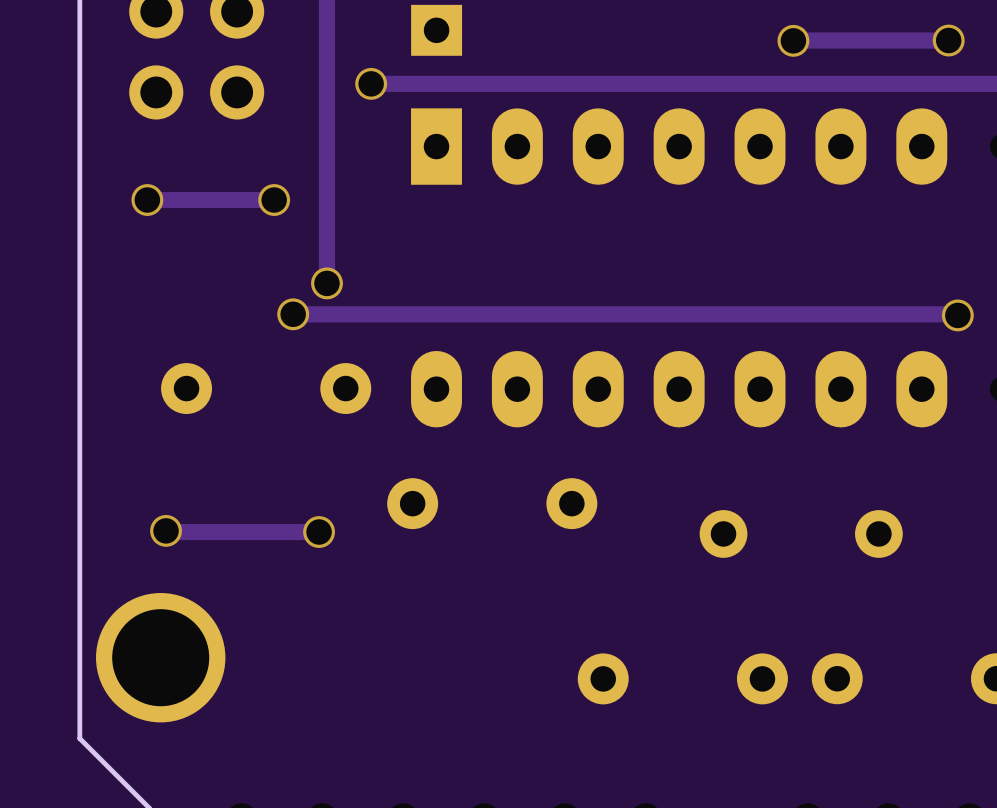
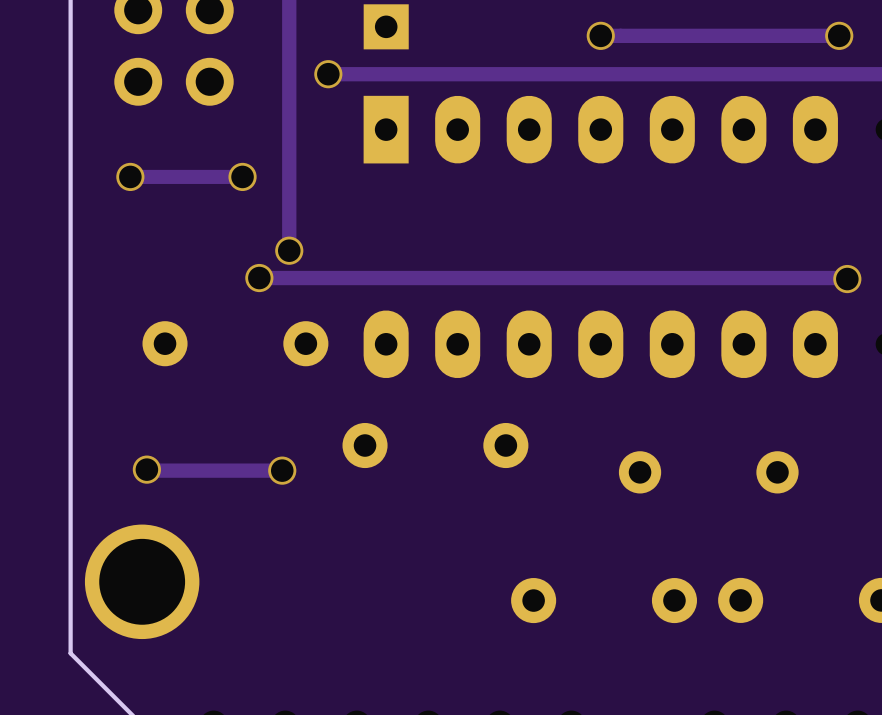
track: none -> (702, 35) (600, 35)
via position: (793, 40) -> (600, 35)

